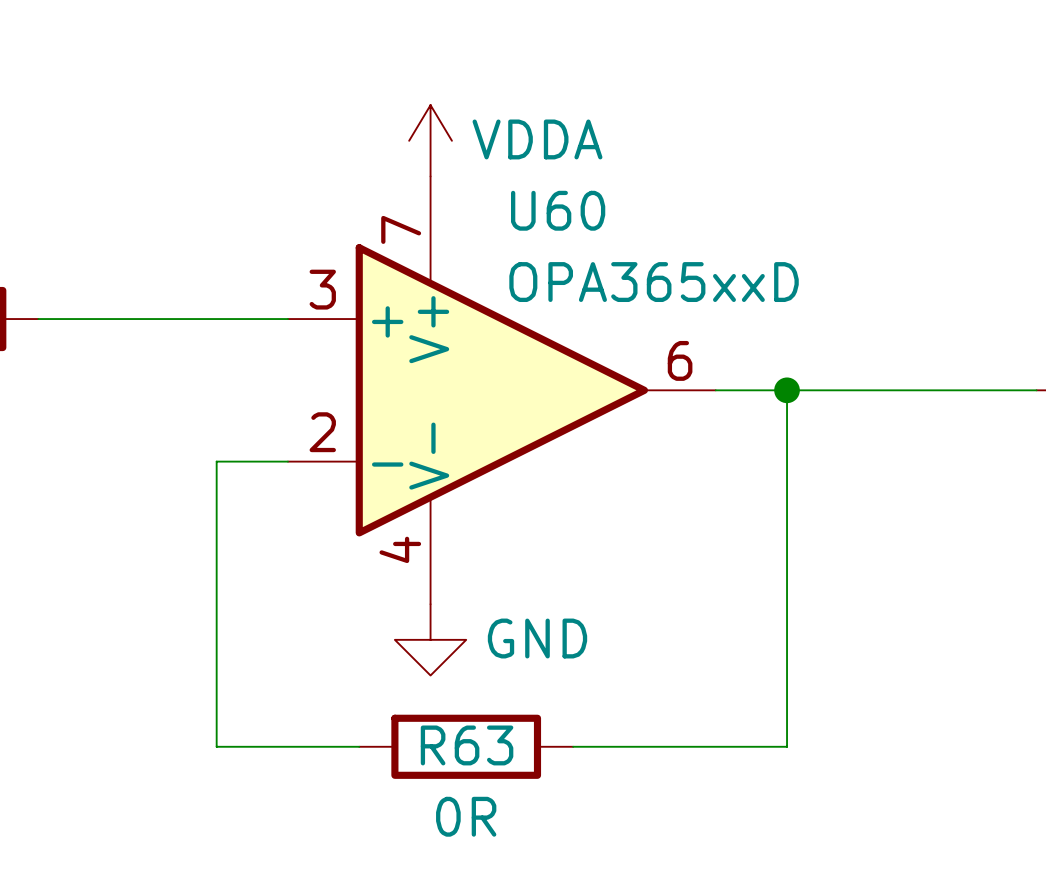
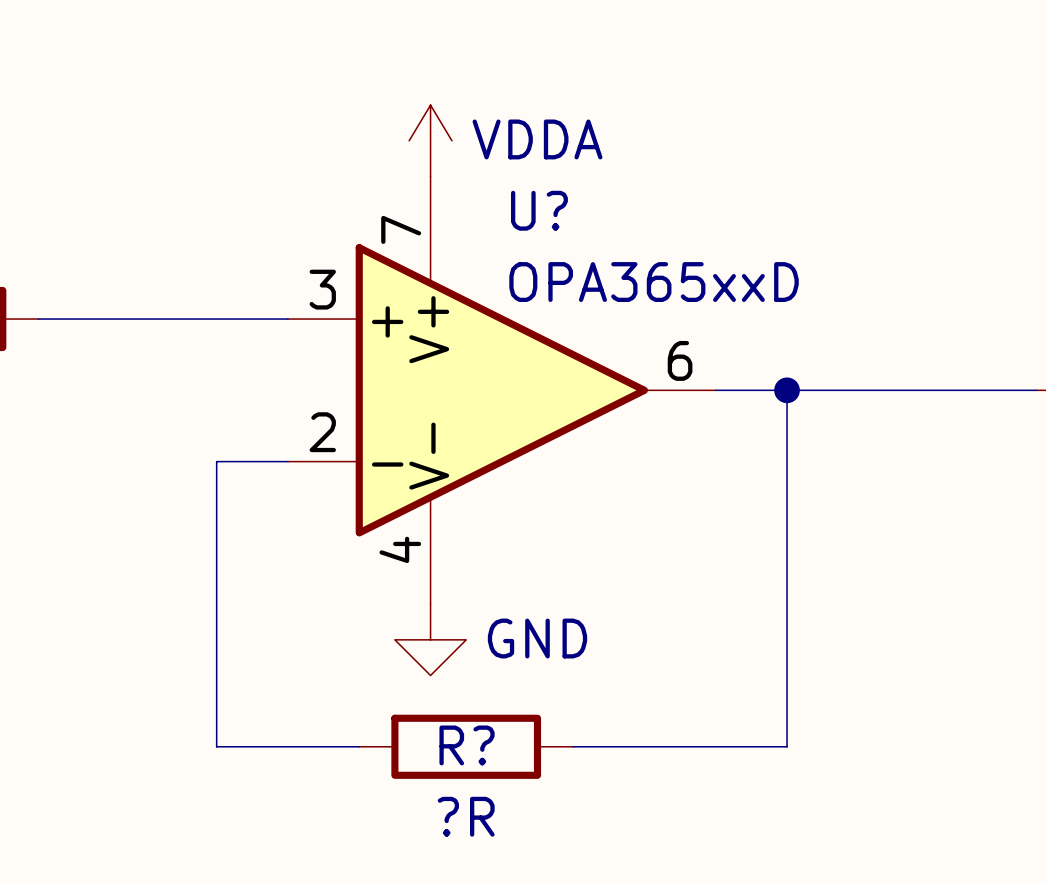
U60 name: U60 (558, 210) -> U? (539, 210)
R63 name: R63 (467, 745) -> R? (467, 745)
R63 value: 0R (466, 816) -> ?R (466, 816)

